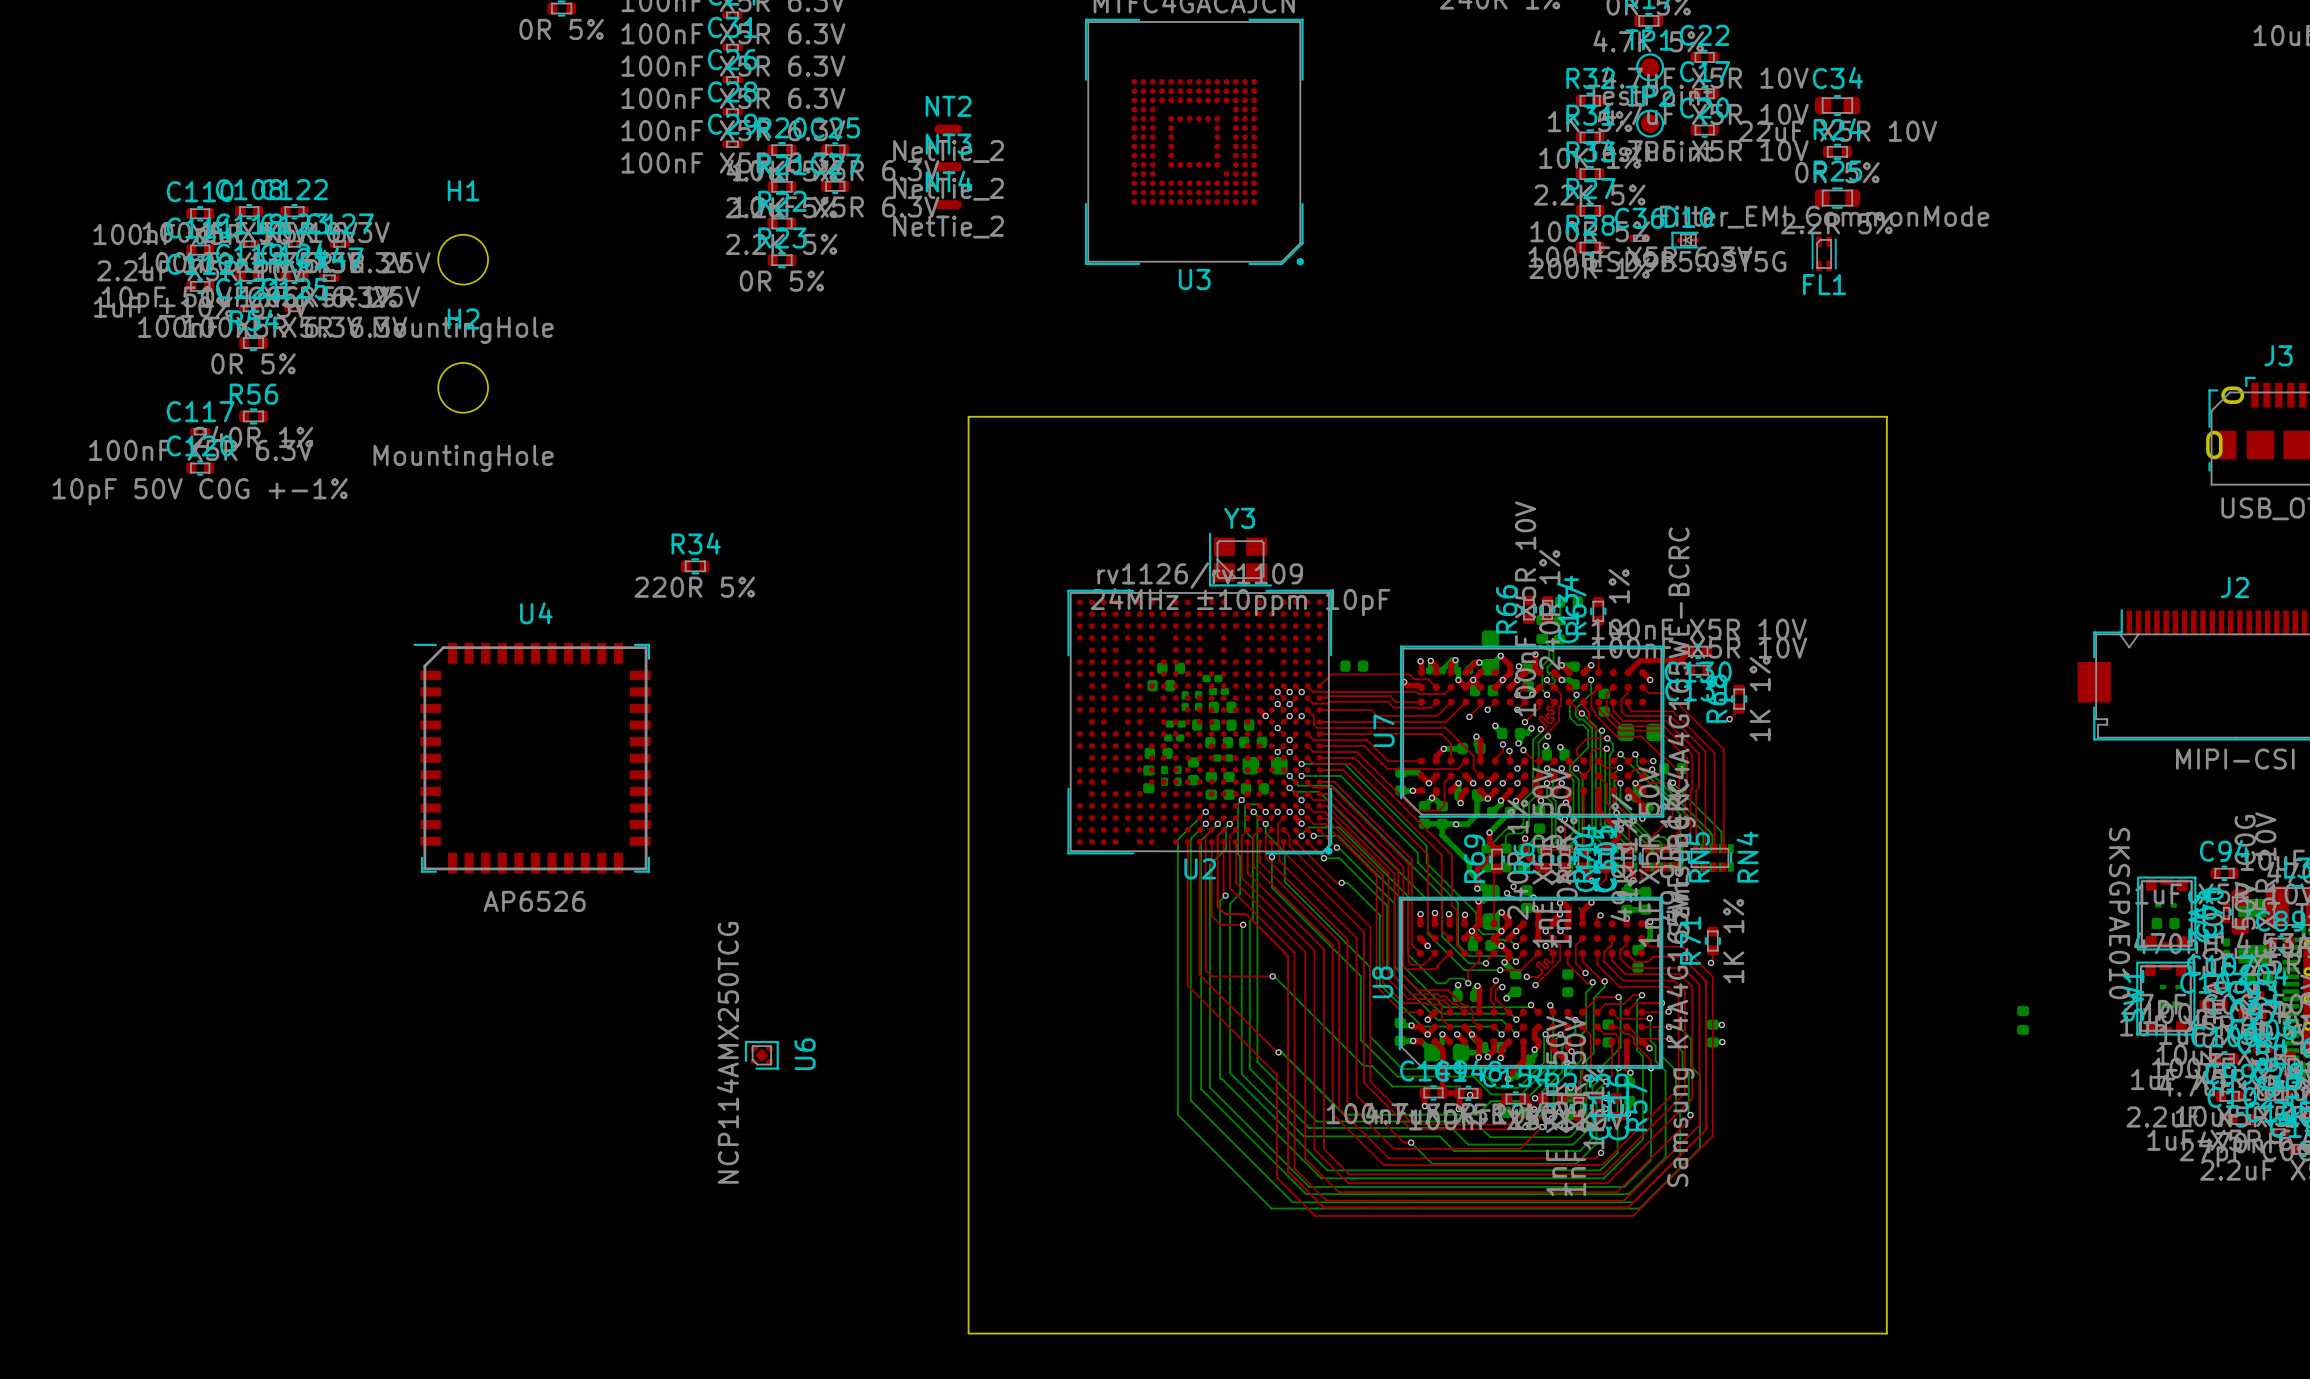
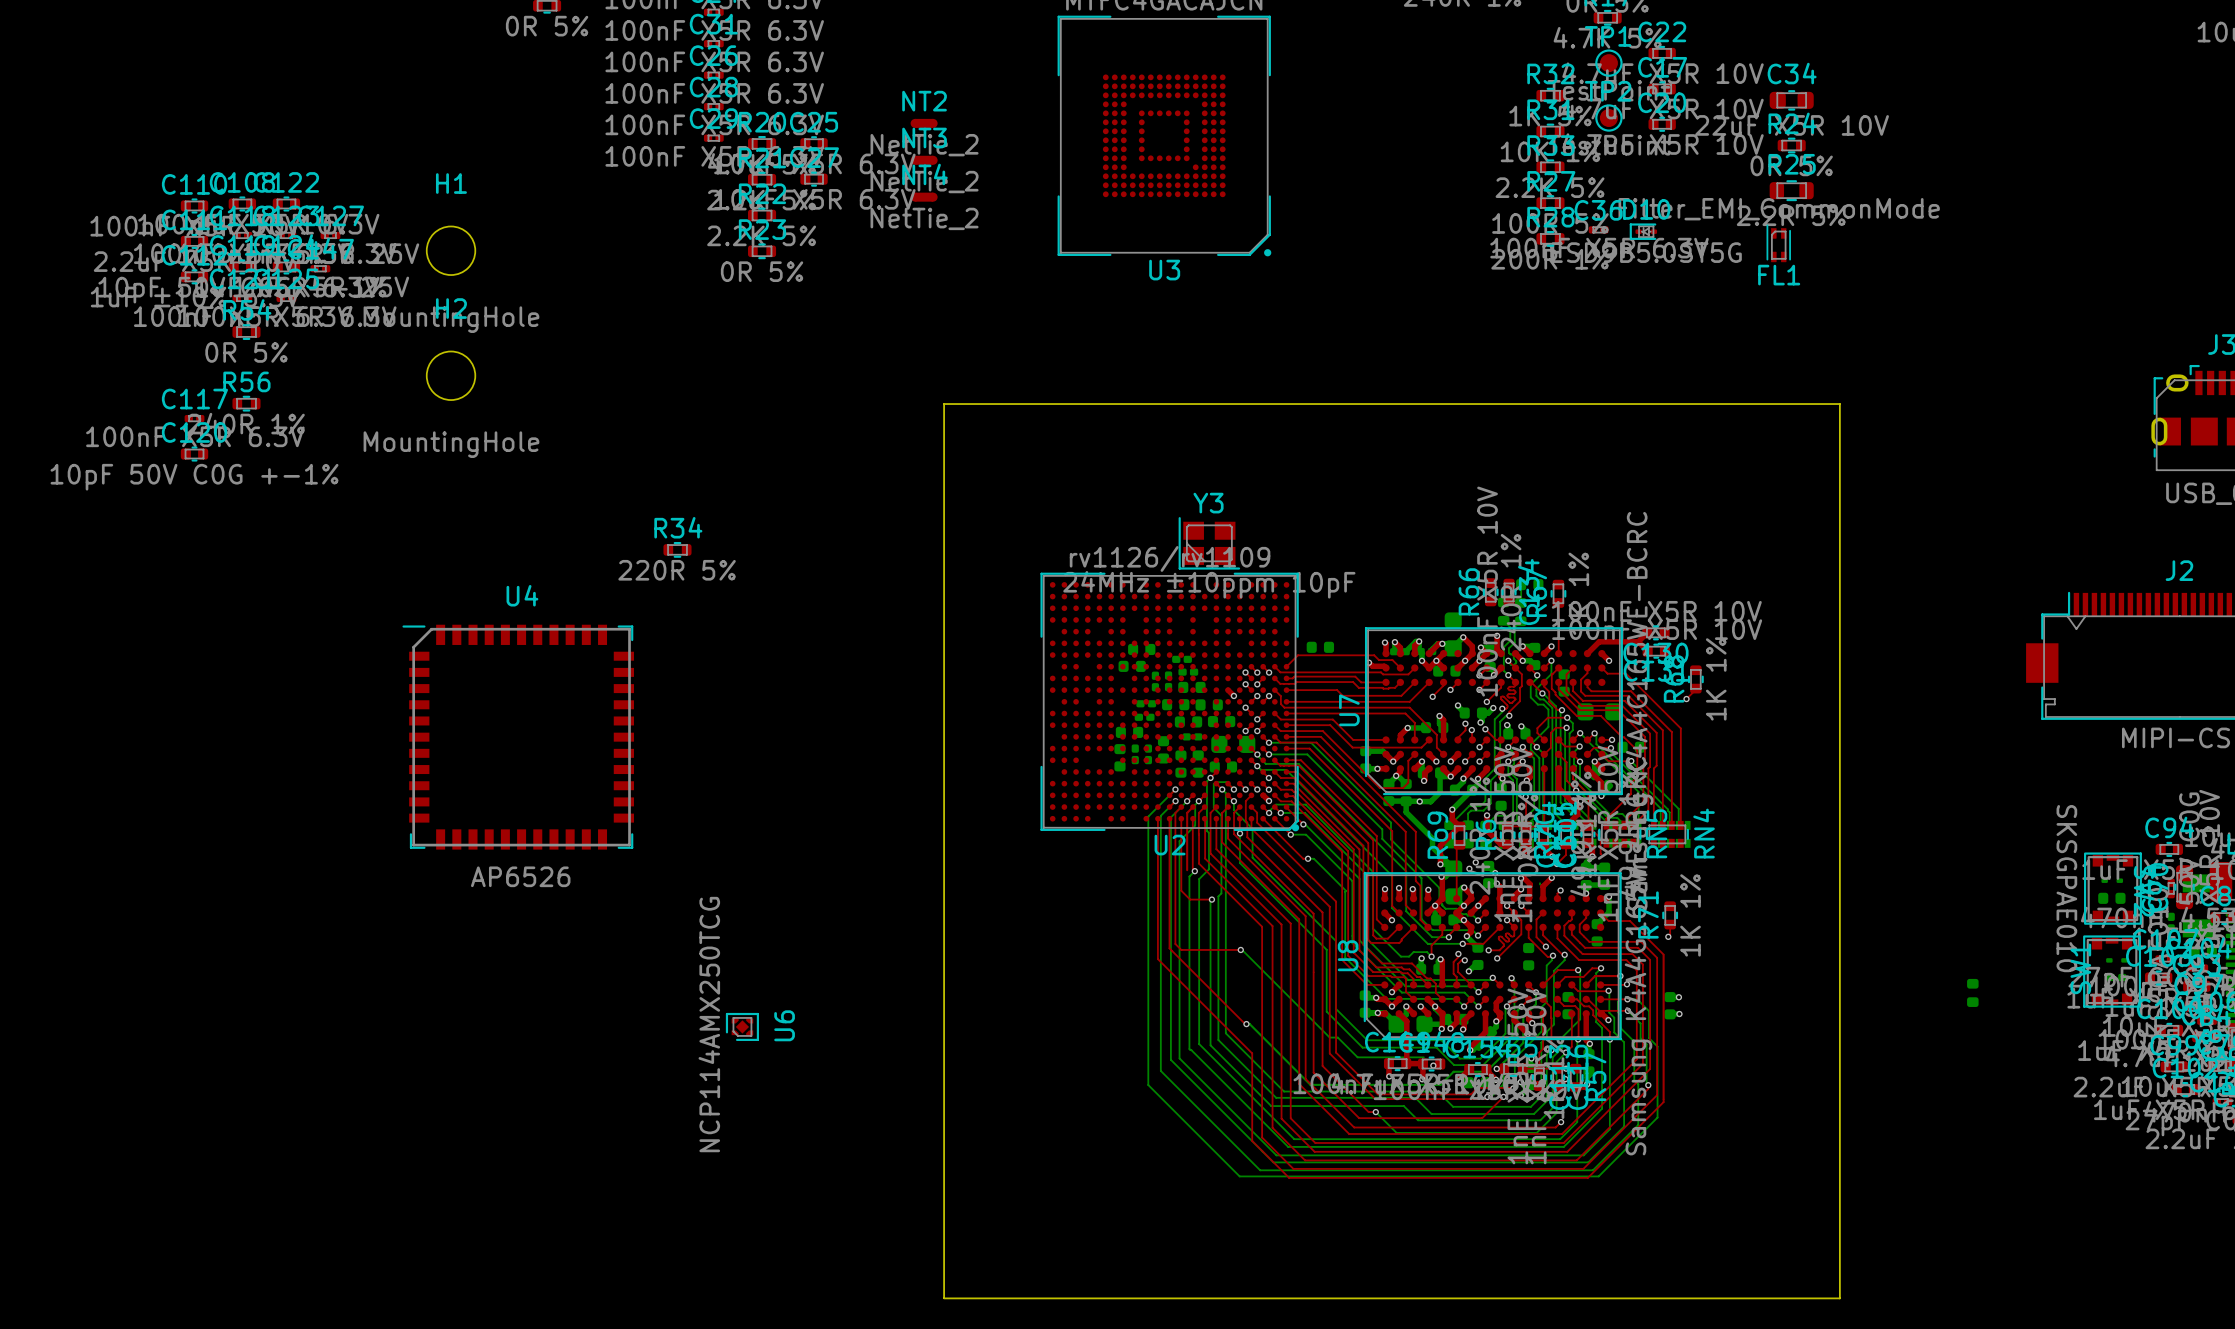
top track: (1217, 894) (1217, 906) (1225, 914) (1246, 914) (1288, 956) (1288, 1171) (1323, 1207) (1628, 1207) (1706, 1129) -> none
top track: (1671, 946) (1682, 946) (1712, 976) (1712, 1136) (1633, 1215) (1315, 1215) (1276, 1177) (1276, 1074) -> (1663, 1099) (1663, 1102) (1587, 1177) (1289, 1177) (1252, 1140) (1252, 1053) (1244, 1046)
top track: (1626, 953) (1635, 962) (1648, 962) (1653, 956) (1681, 956) (1706, 981) -> (1630, 921) (1663, 954)

